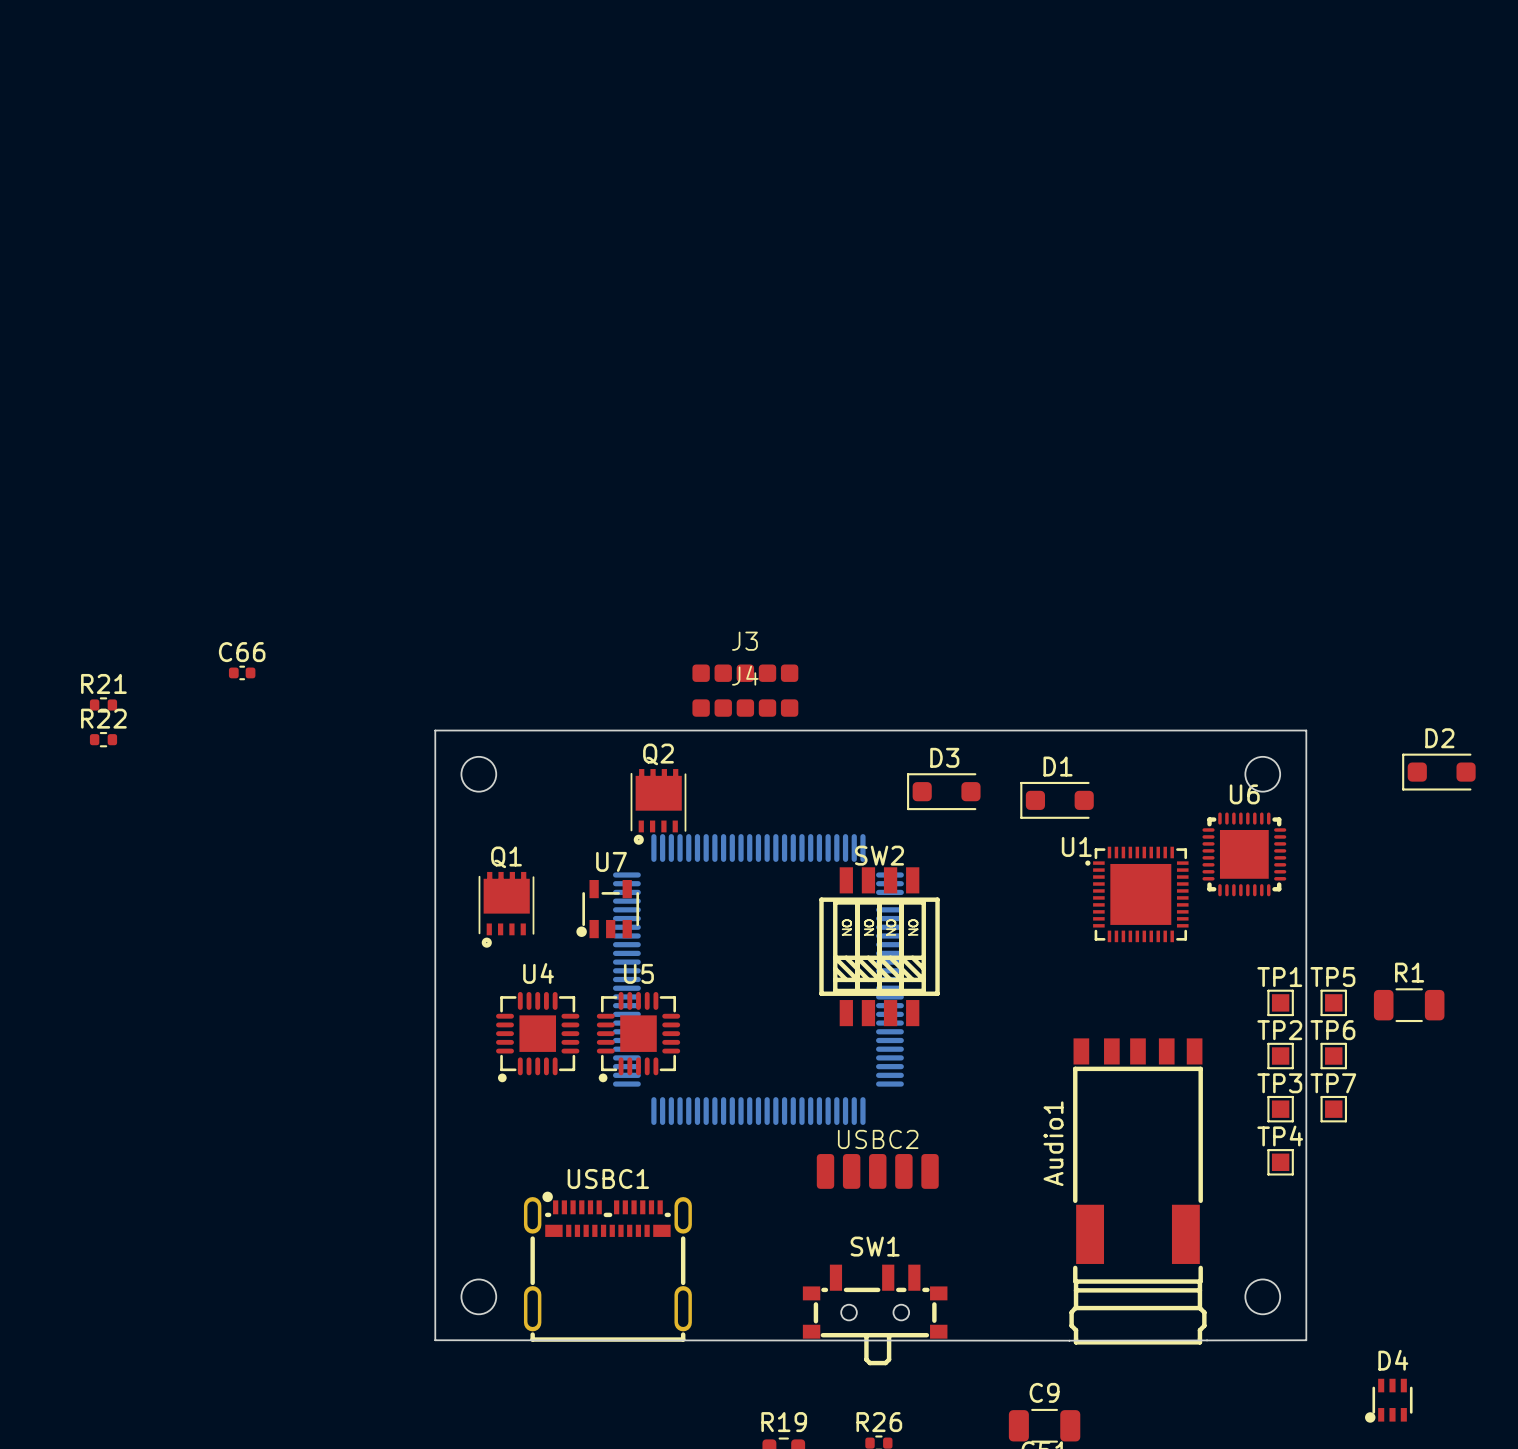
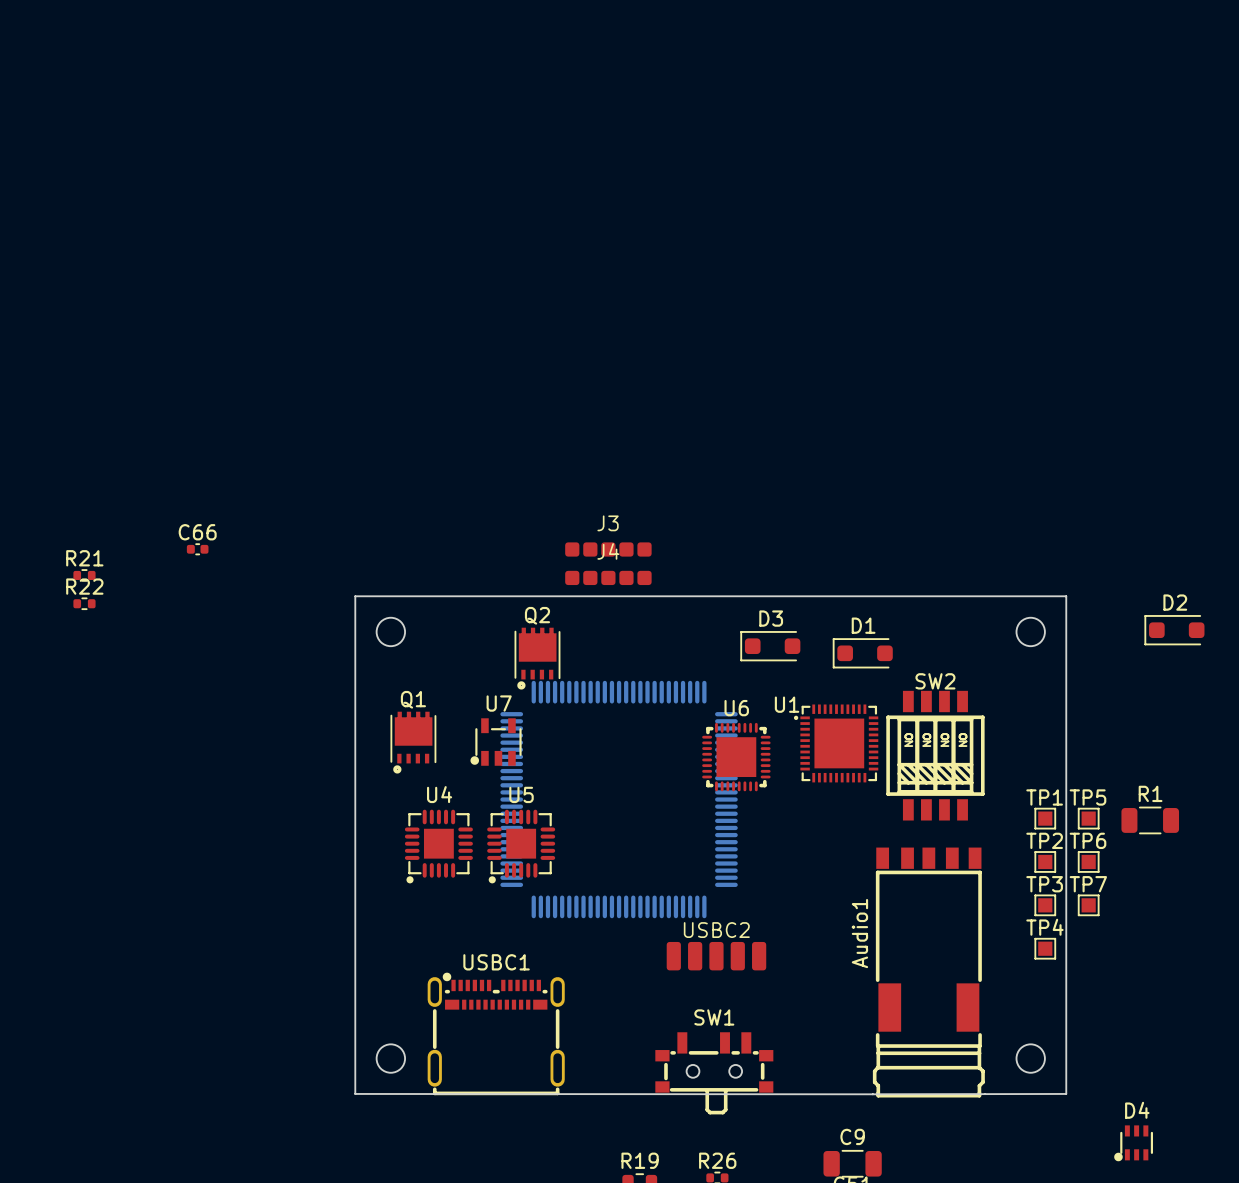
U6 position: (1244, 854) -> (736, 757)
U1 position: (1136, 894) -> (836, 743)
SW2 position: (879, 946) -> (935, 755)

